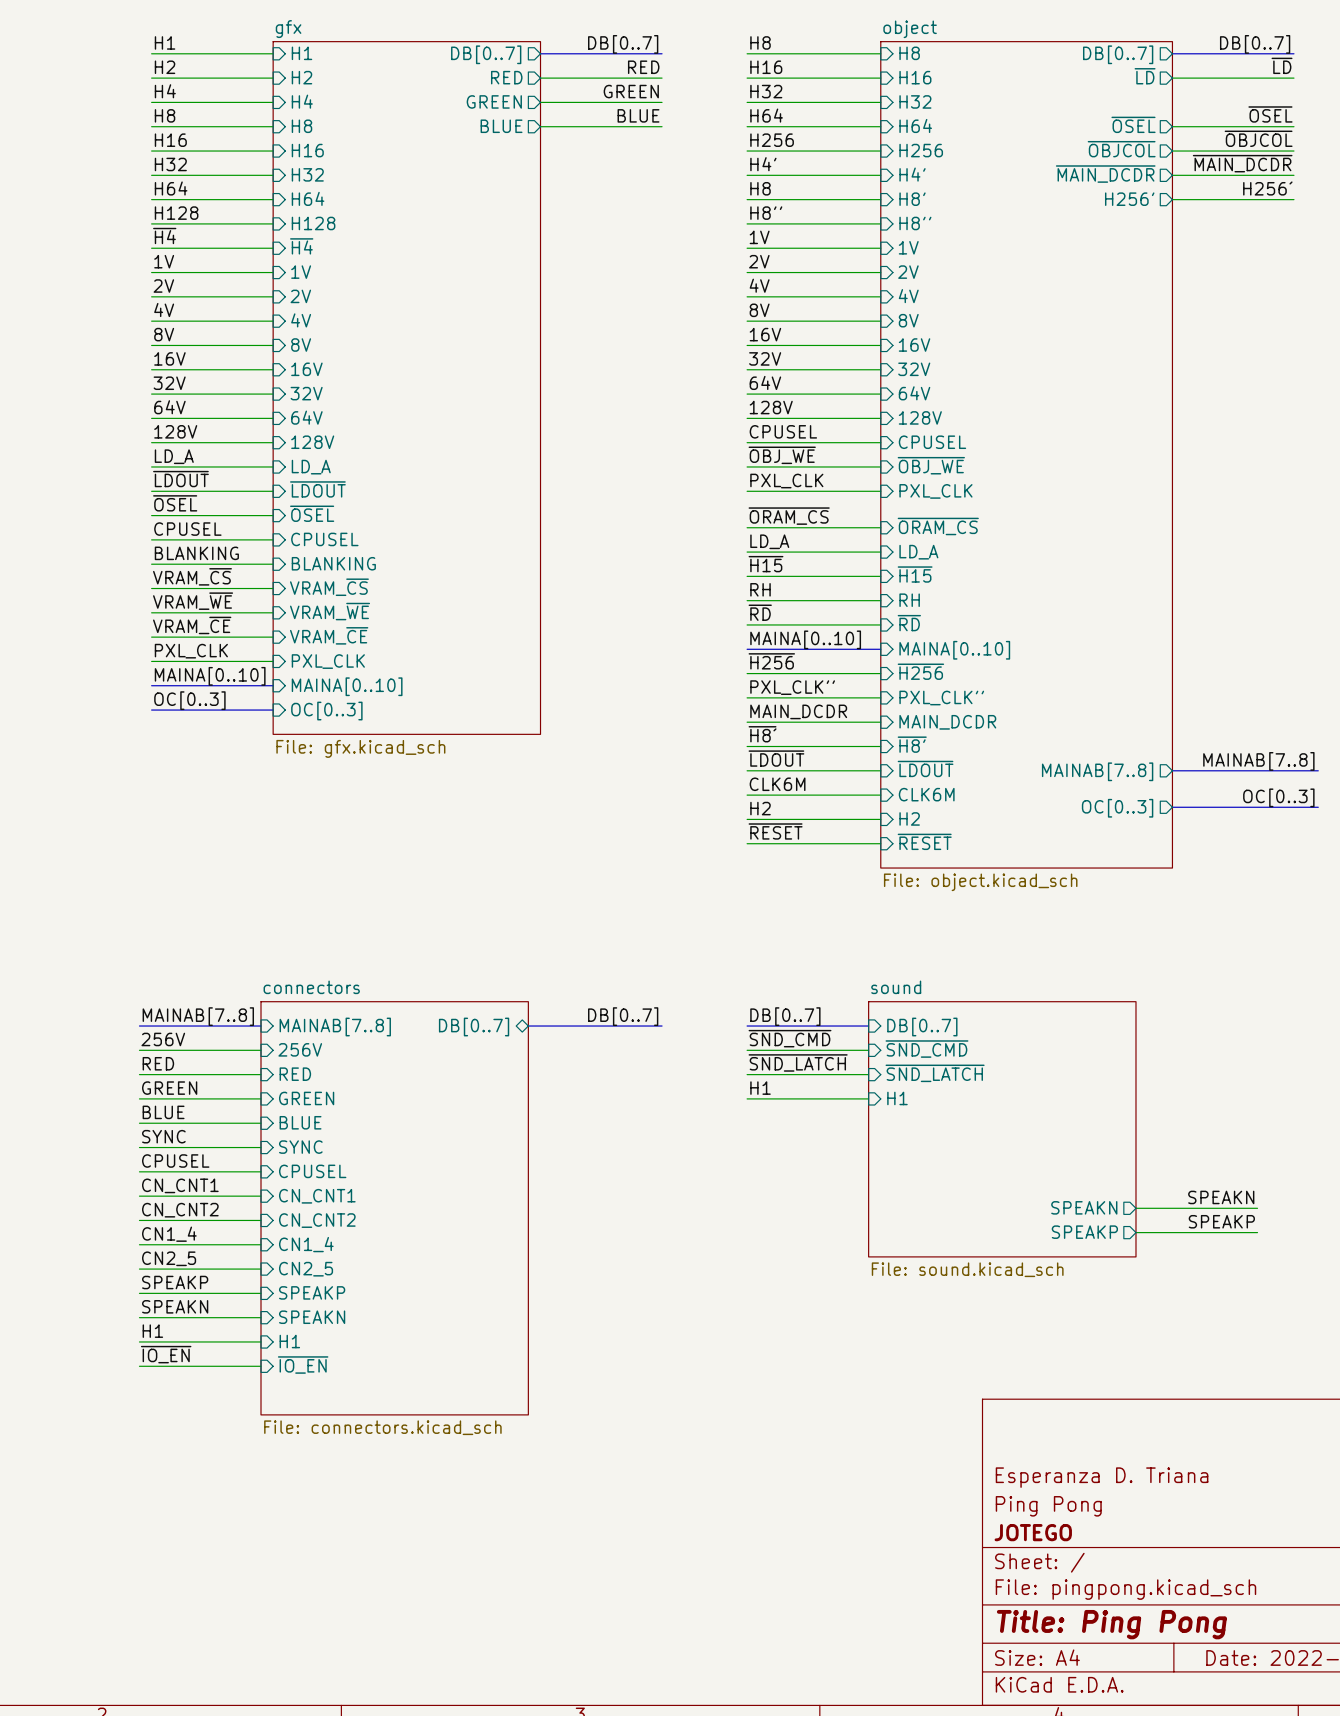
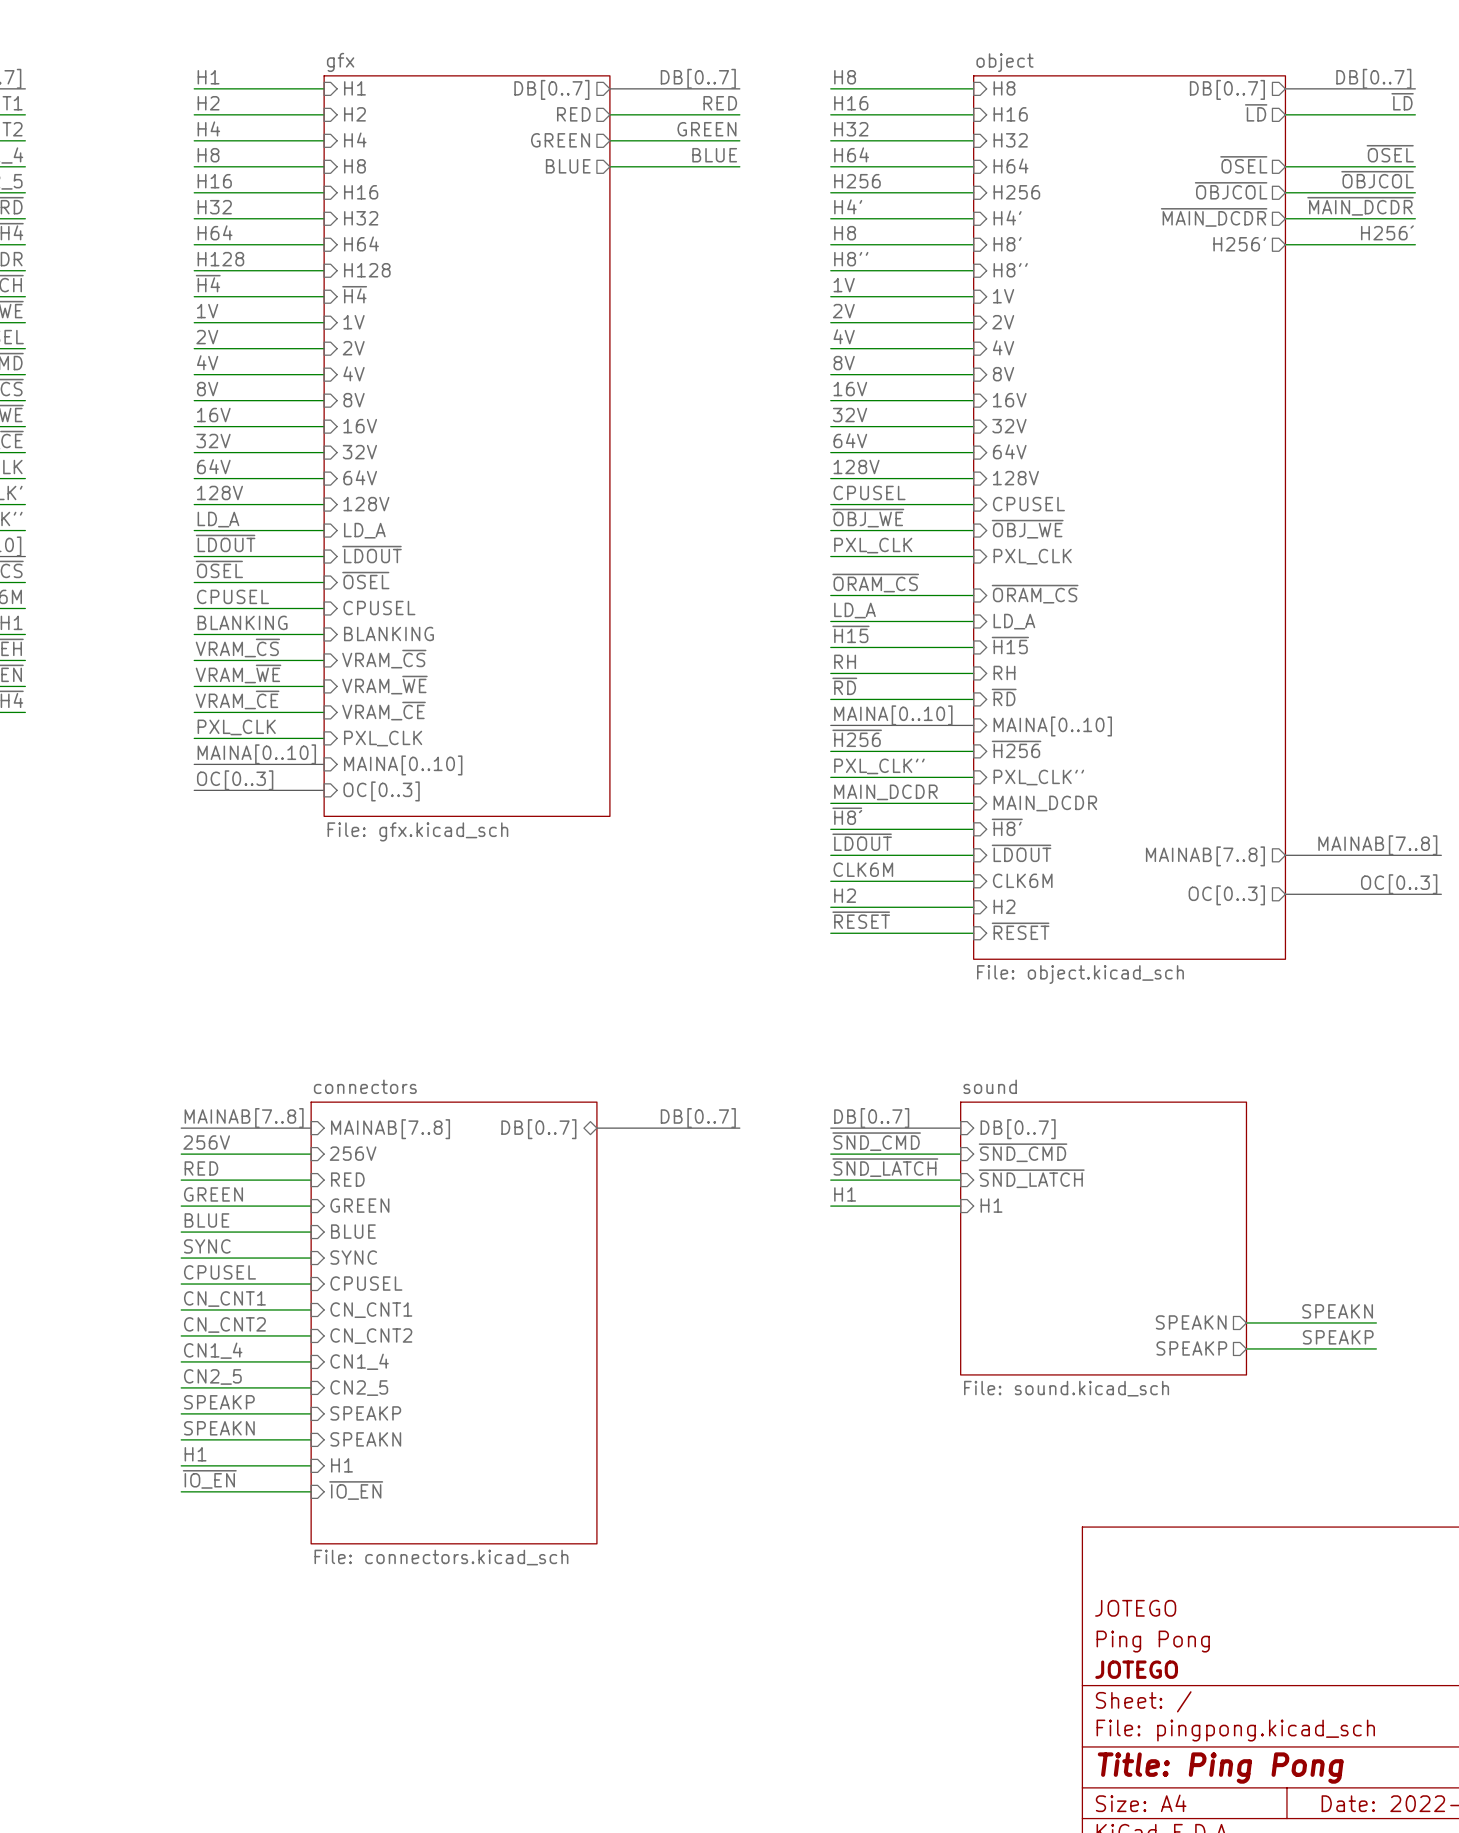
title block: Esperanza D. Triana (1102, 1477) -> JOTEGO (1135, 1608)

